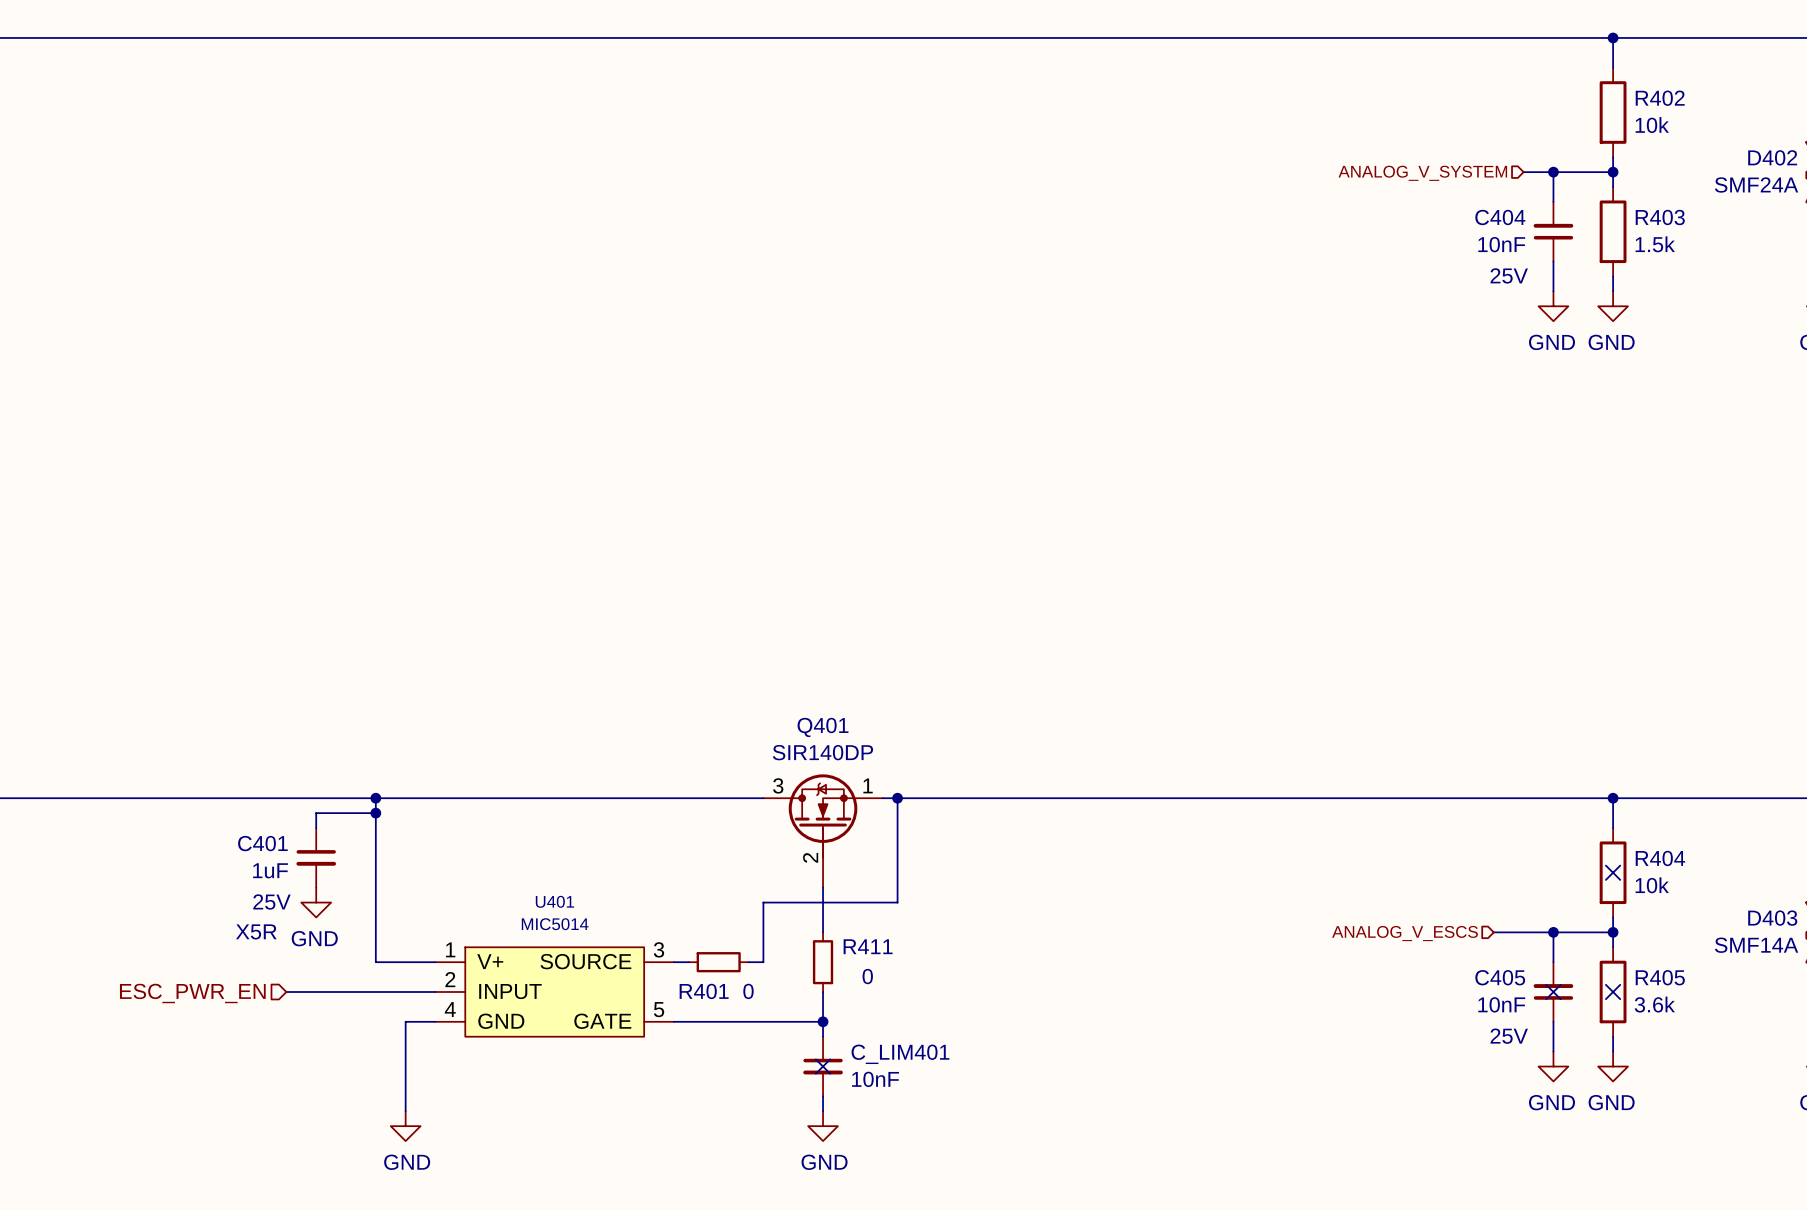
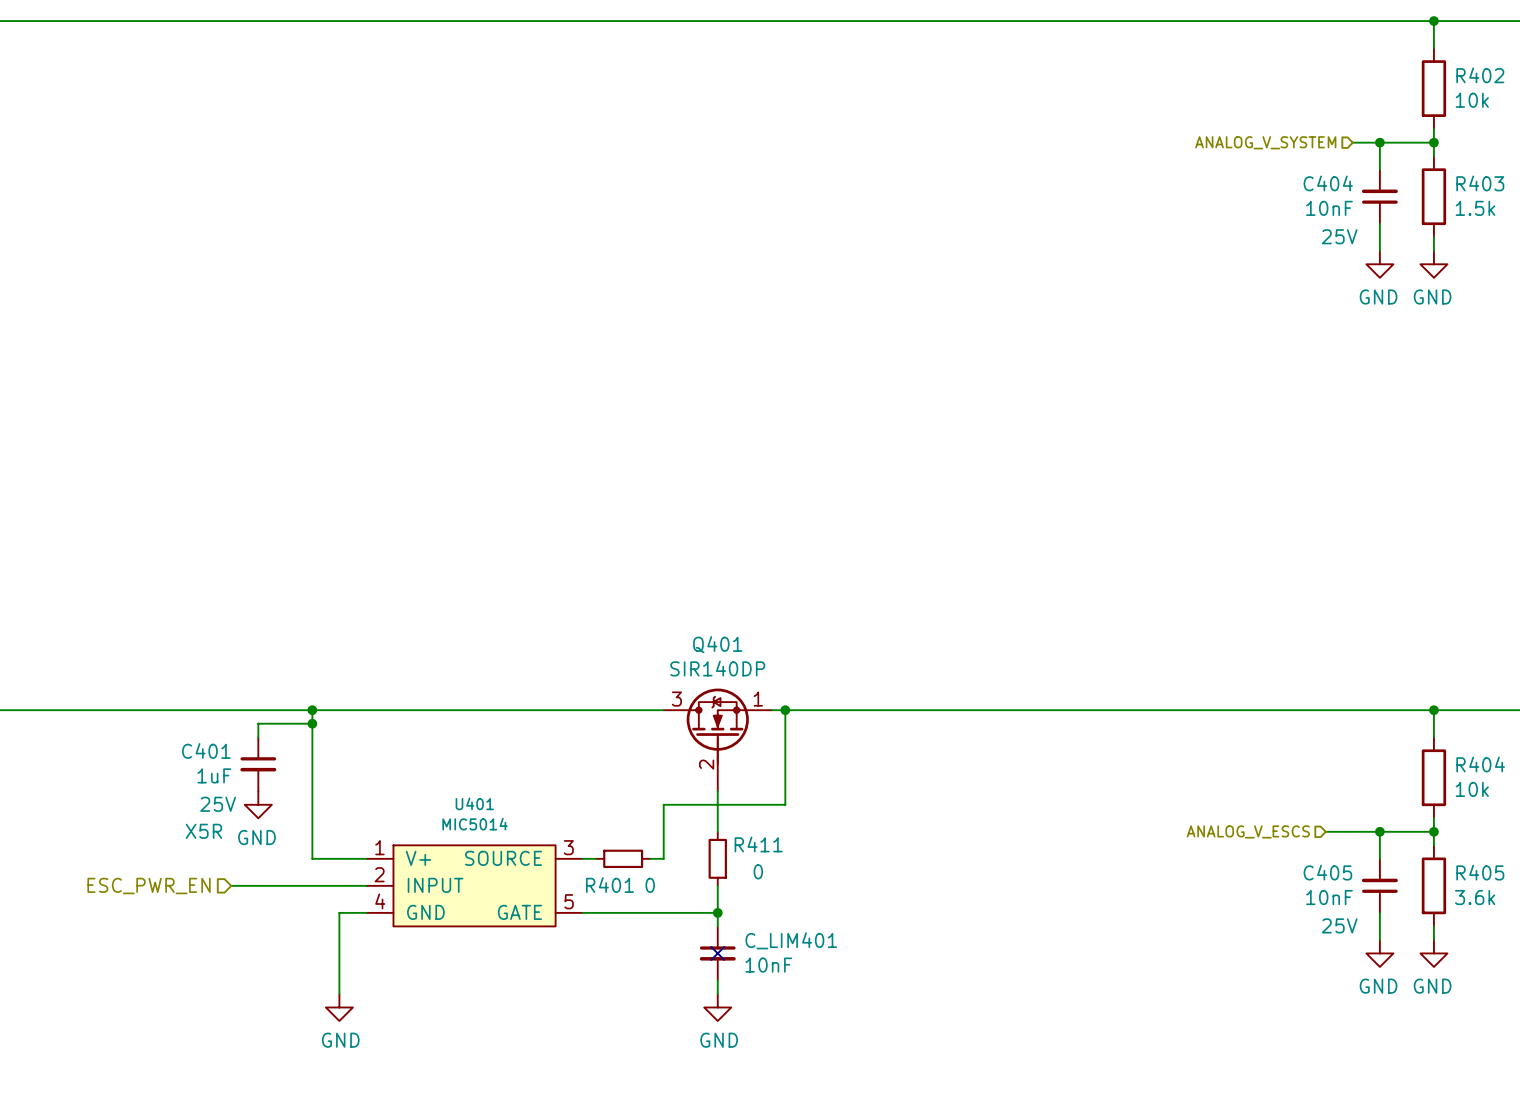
no-connect mark: (1613, 872) -> none
no-connect mark: (1553, 992) -> none
no-connect mark: (1613, 992) -> none

